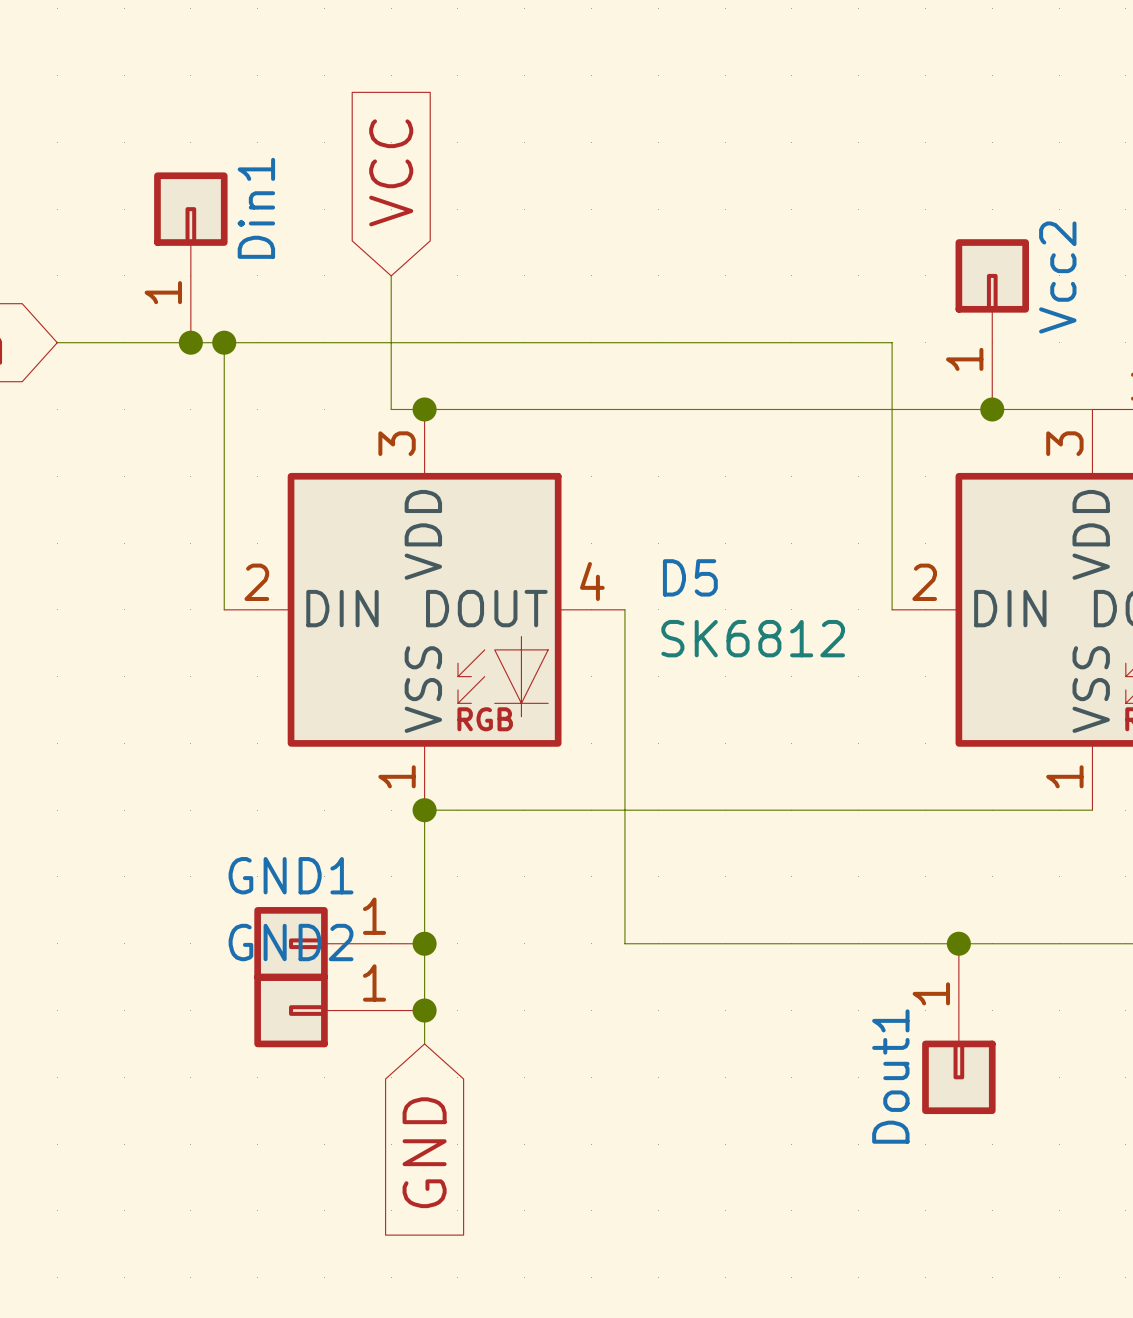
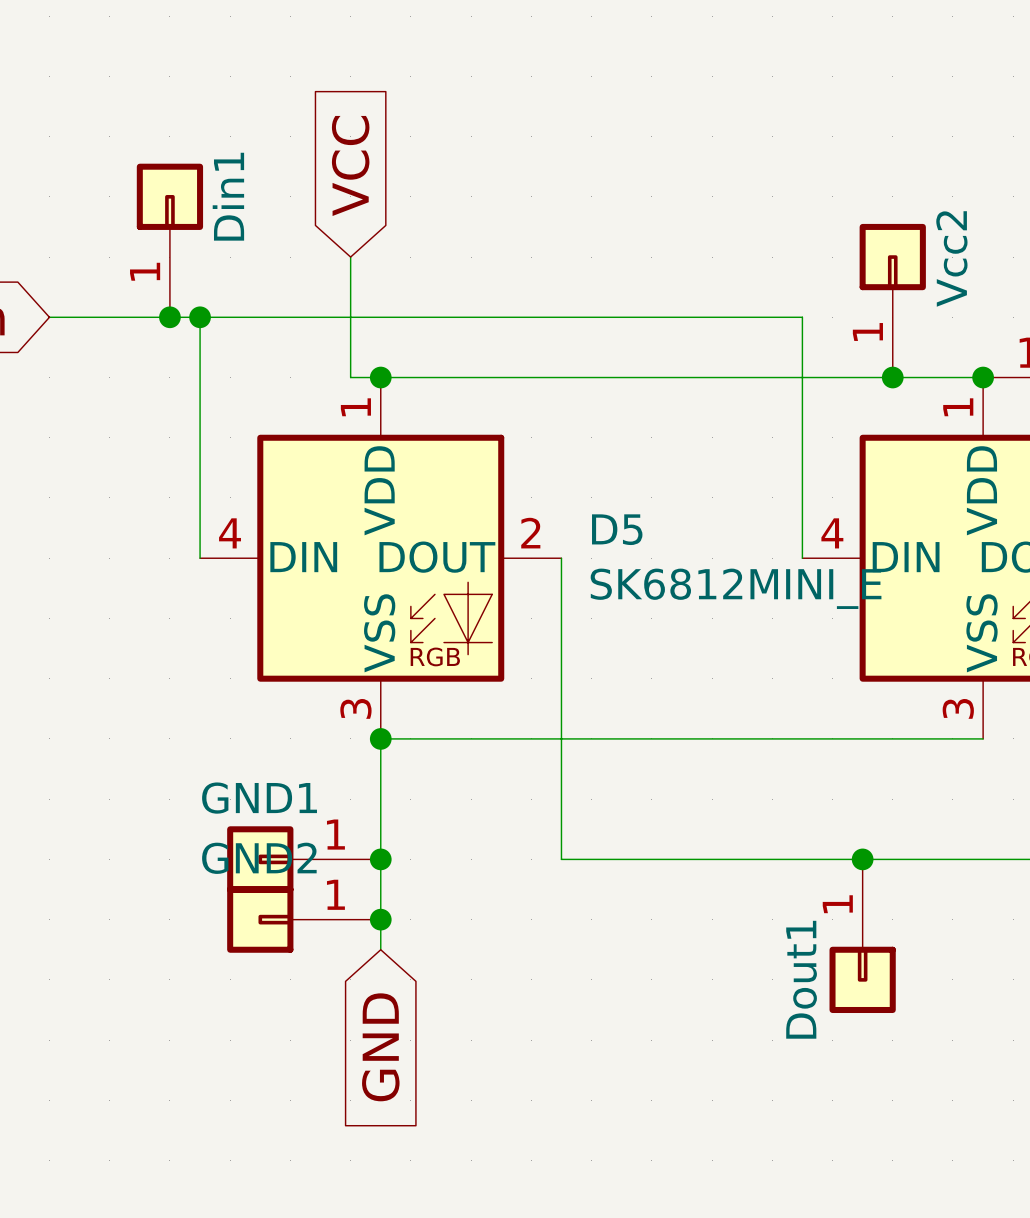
junction: none -> (983, 377)
D5 pin number: 3 (397, 443) -> 1 (355, 407)
part pin number: 3 (1064, 443) -> 1 (958, 407)
D5 pin number: 4 (592, 581) -> 2 (530, 533)
D5 pin number: 2 (256, 582) -> 4 (230, 533)
part pin number: 2 (924, 582) -> 4 (832, 533)
D5 value: SK6812 (753, 638) -> SK6812MINI_E (736, 588)
D5 pin number: 1 (397, 776) -> 3 (355, 708)
part pin number: 1 (1064, 776) -> 3 (958, 708)

